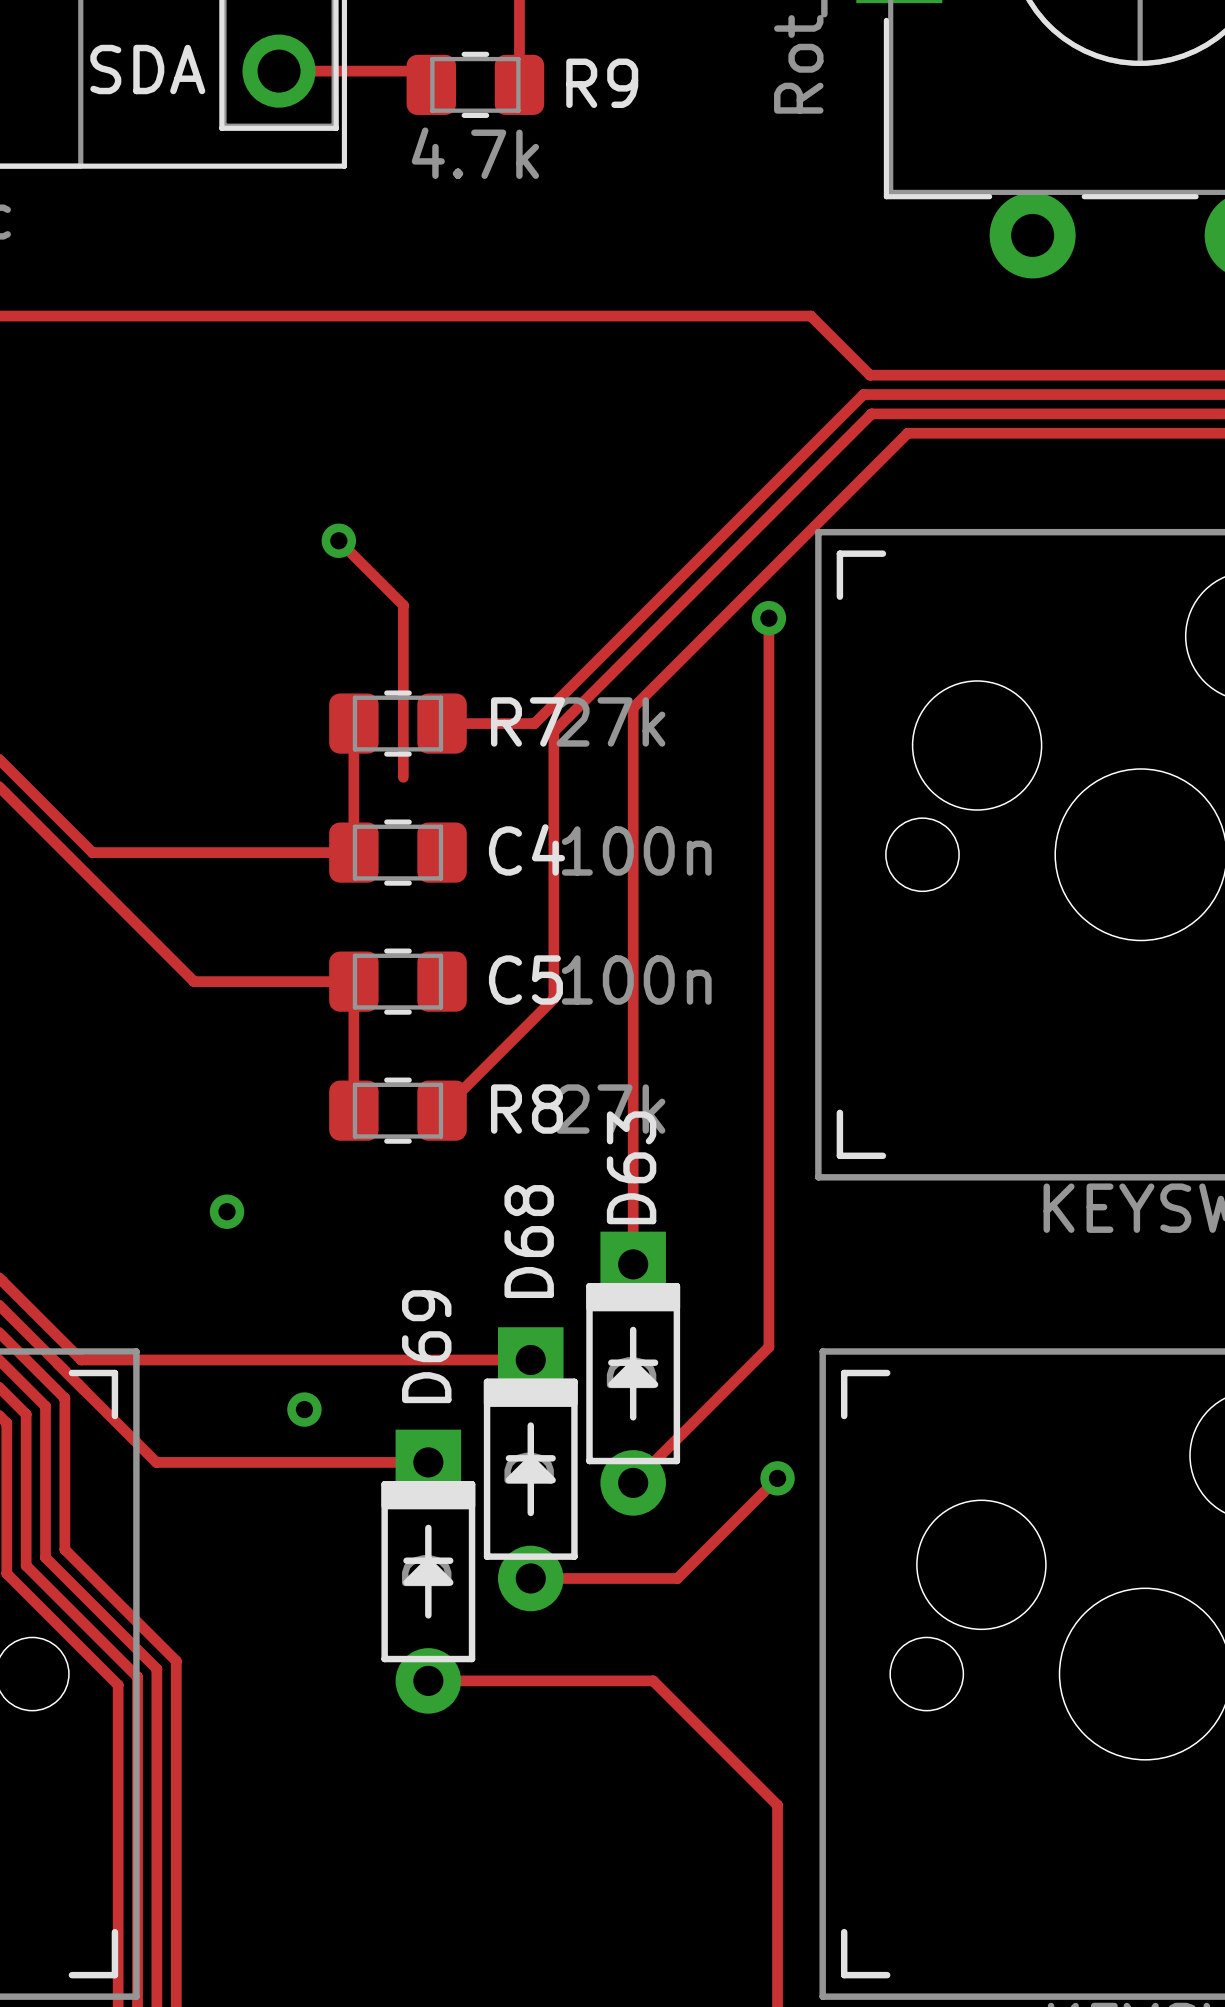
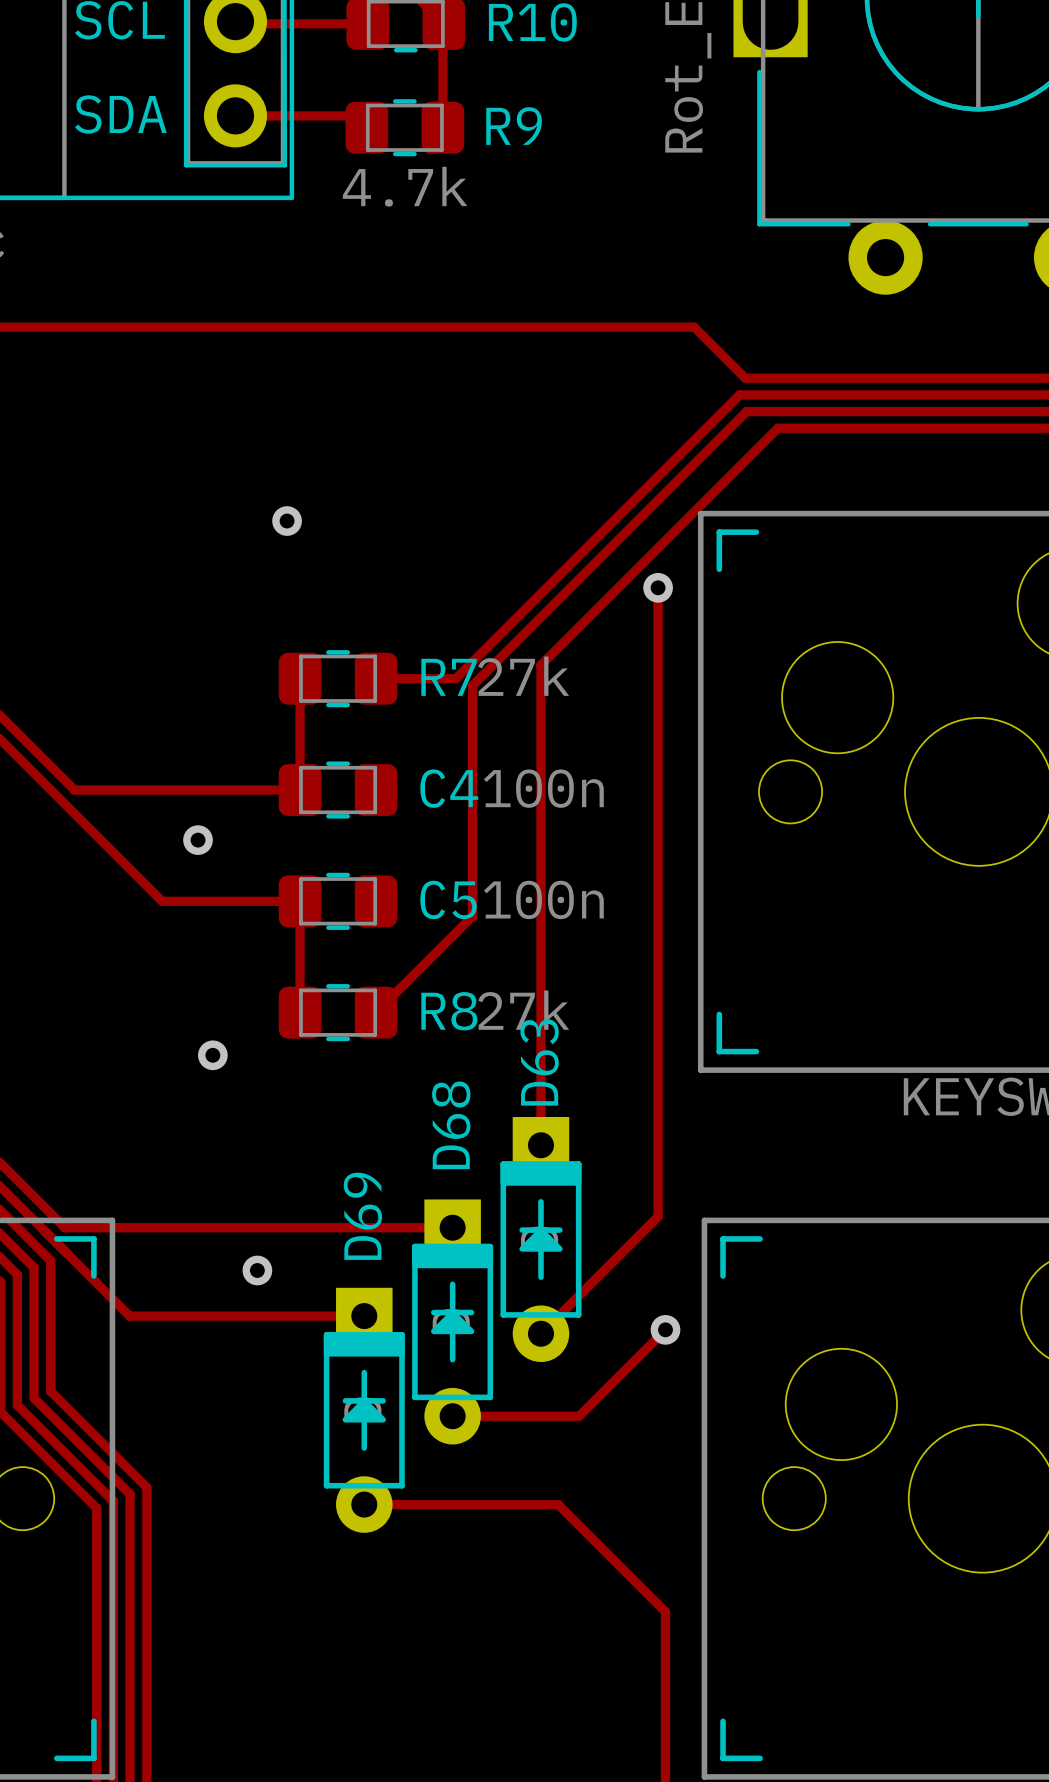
track: (338, 540) (403, 605) (403, 777) -> none
via: none -> (198, 840)
via position: (227, 1211) -> (212, 1055)

